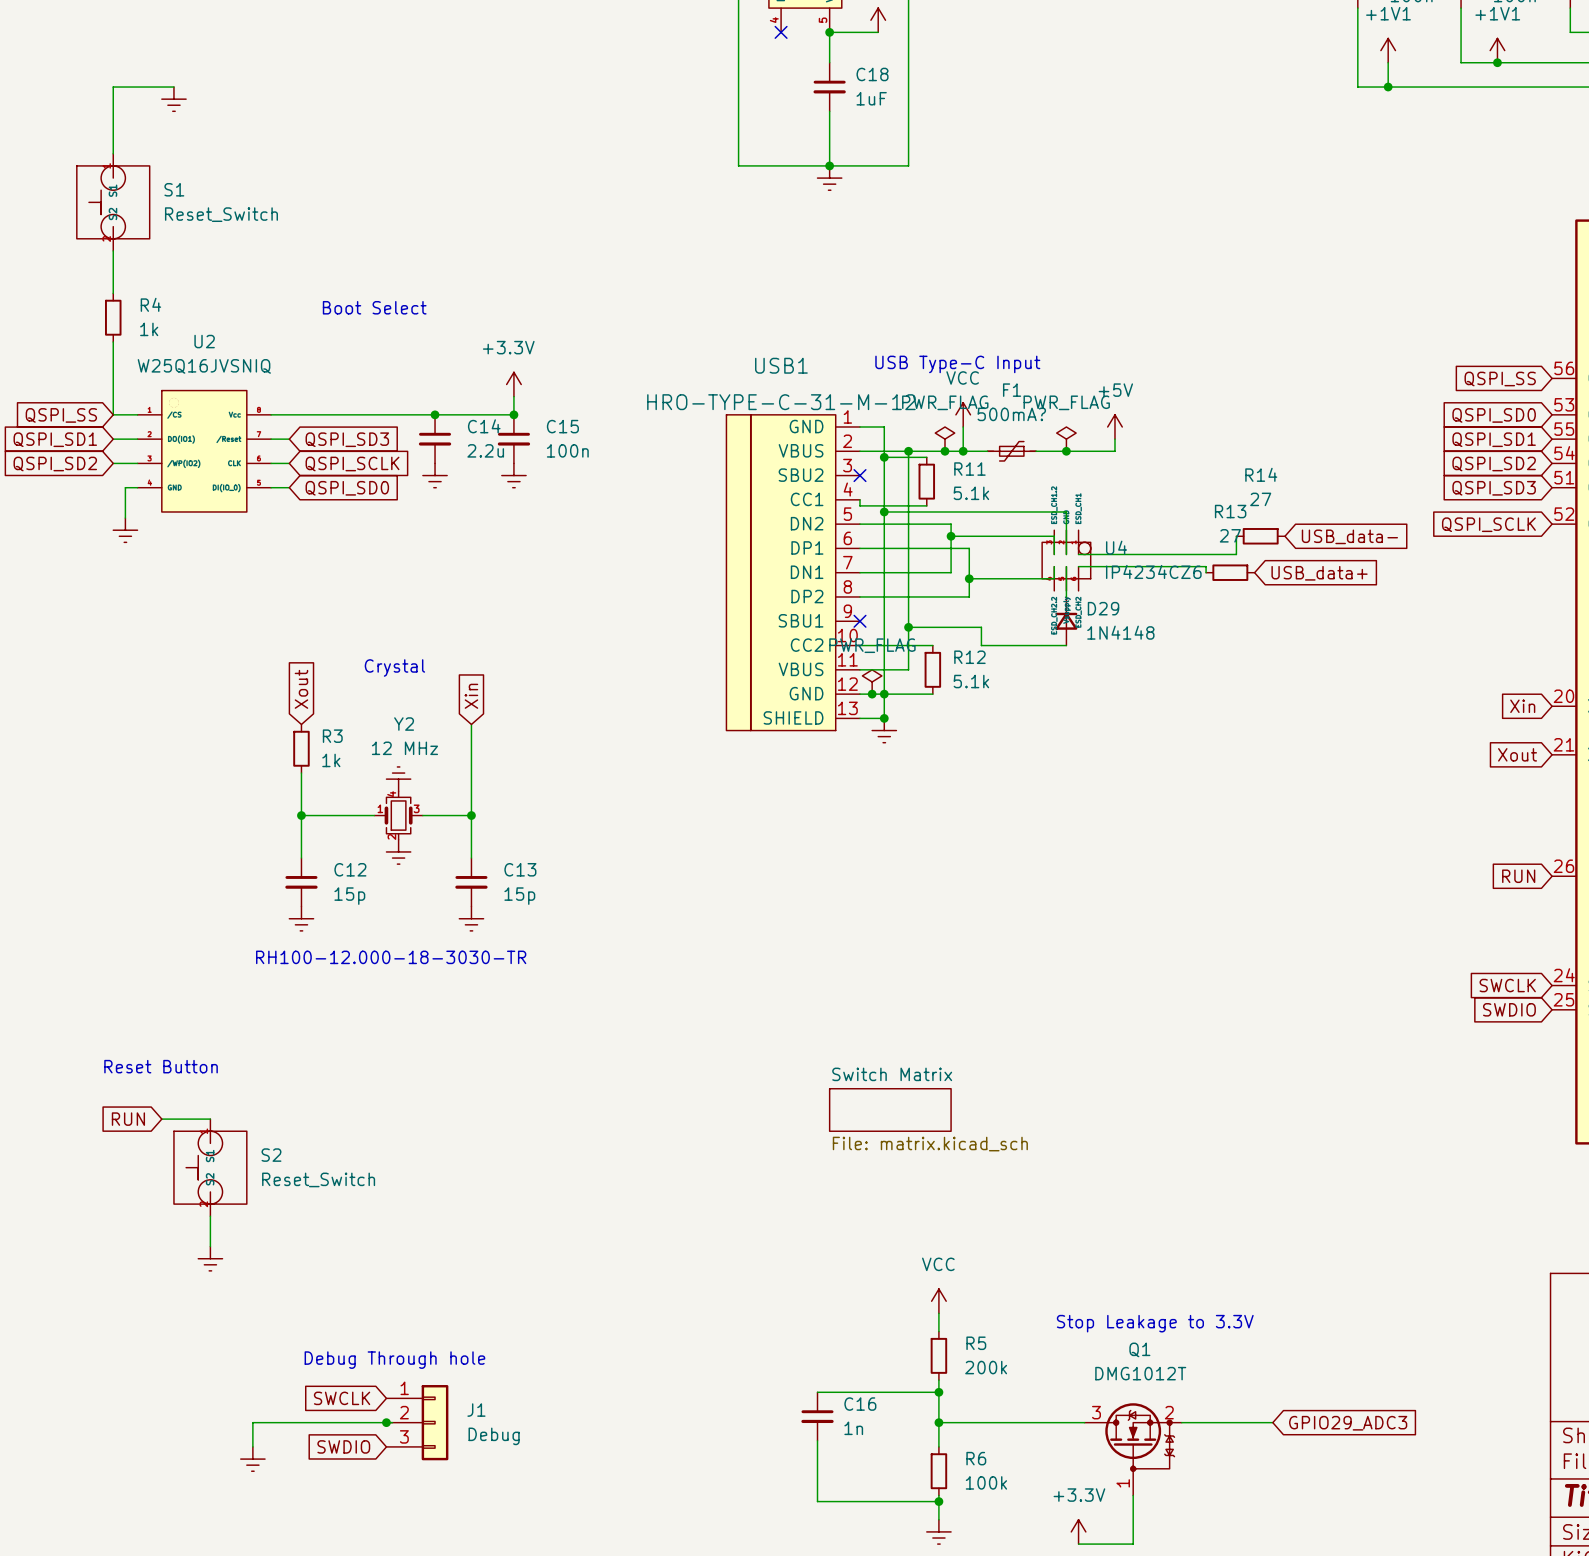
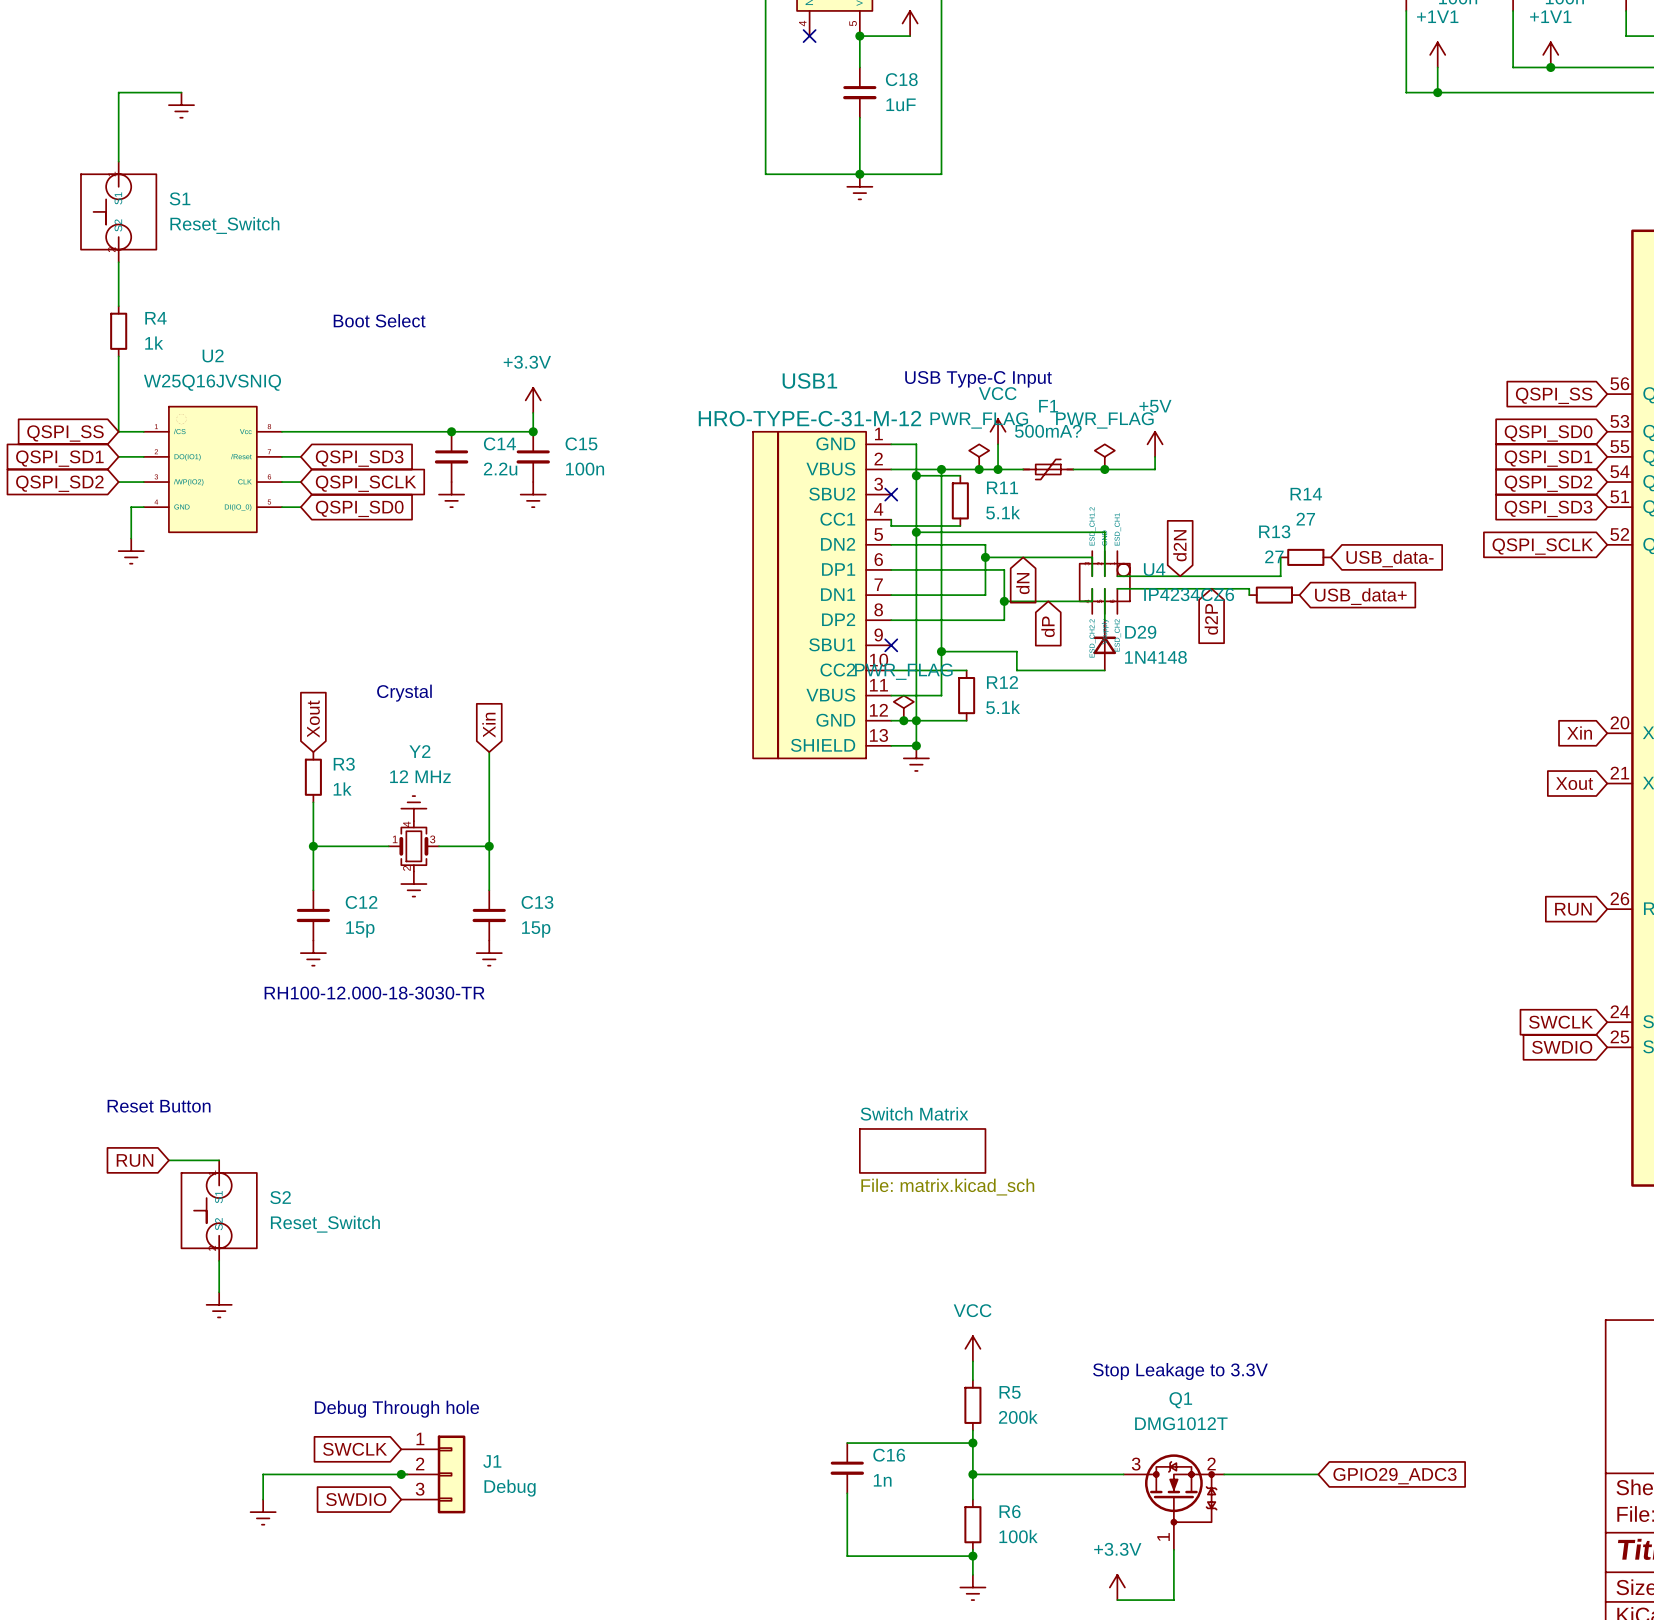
global label: none -> d2N (1179, 545)
global label: none -> dN (1022, 583)
global label: none -> d2P (1211, 619)
global label: none -> dP (1048, 626)

